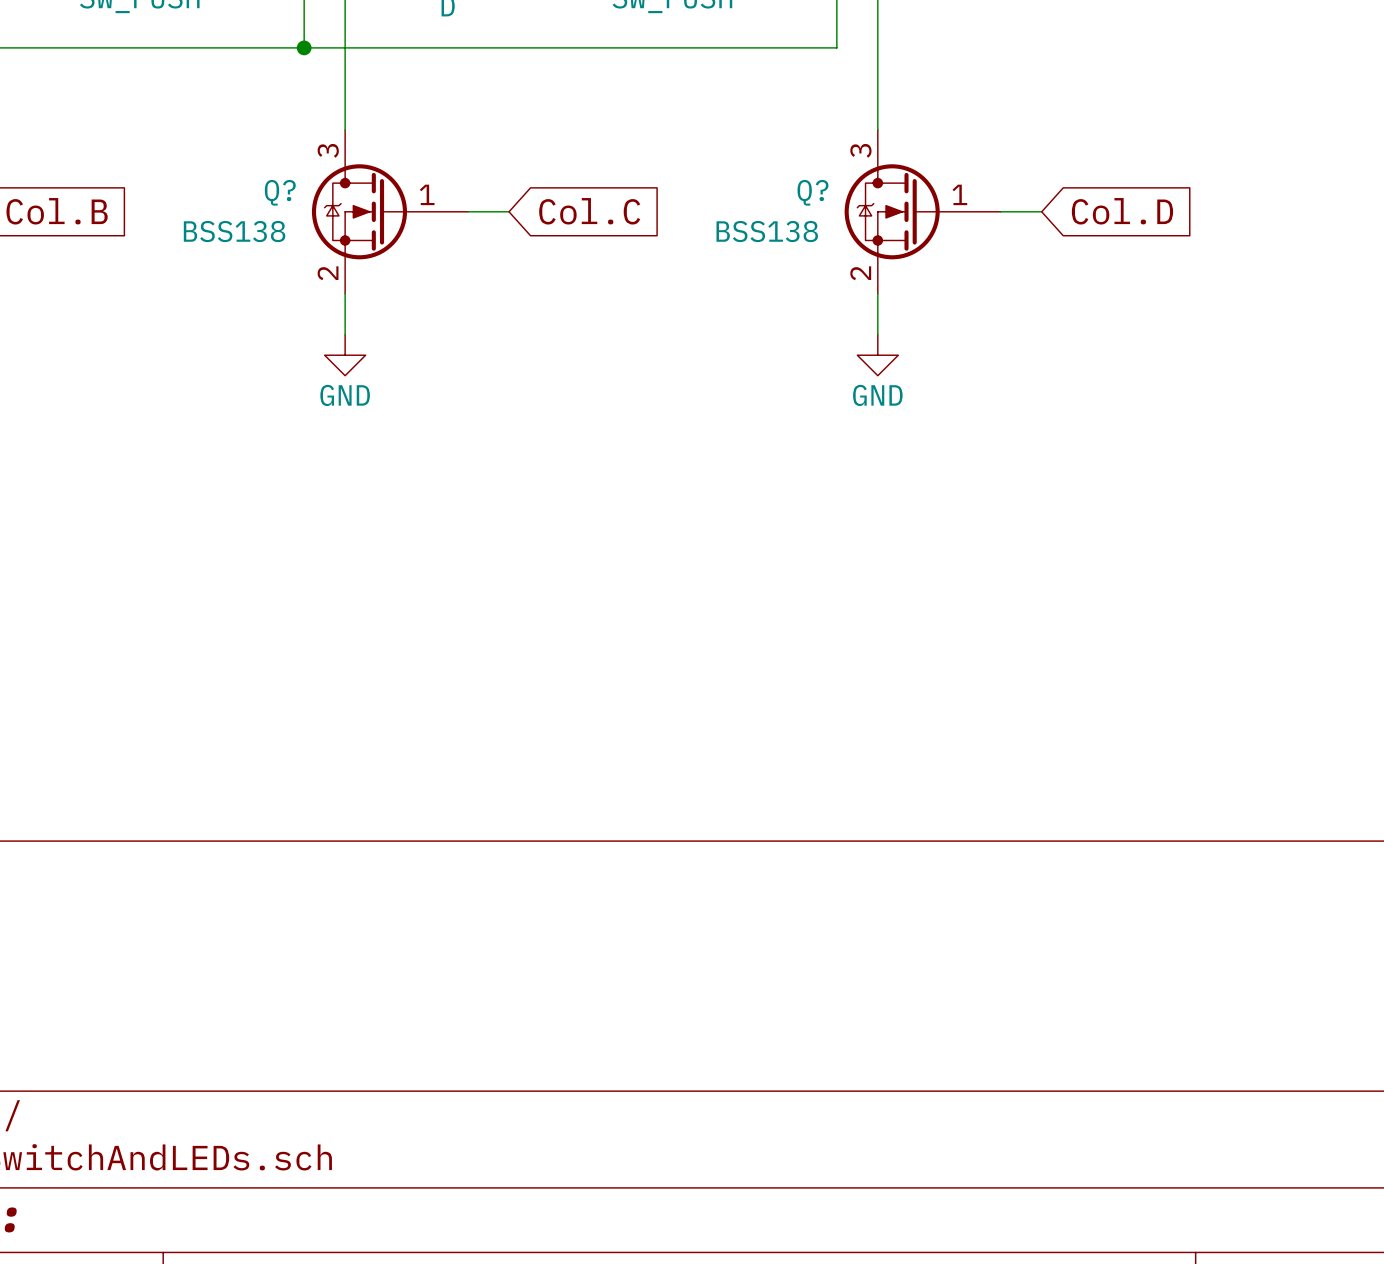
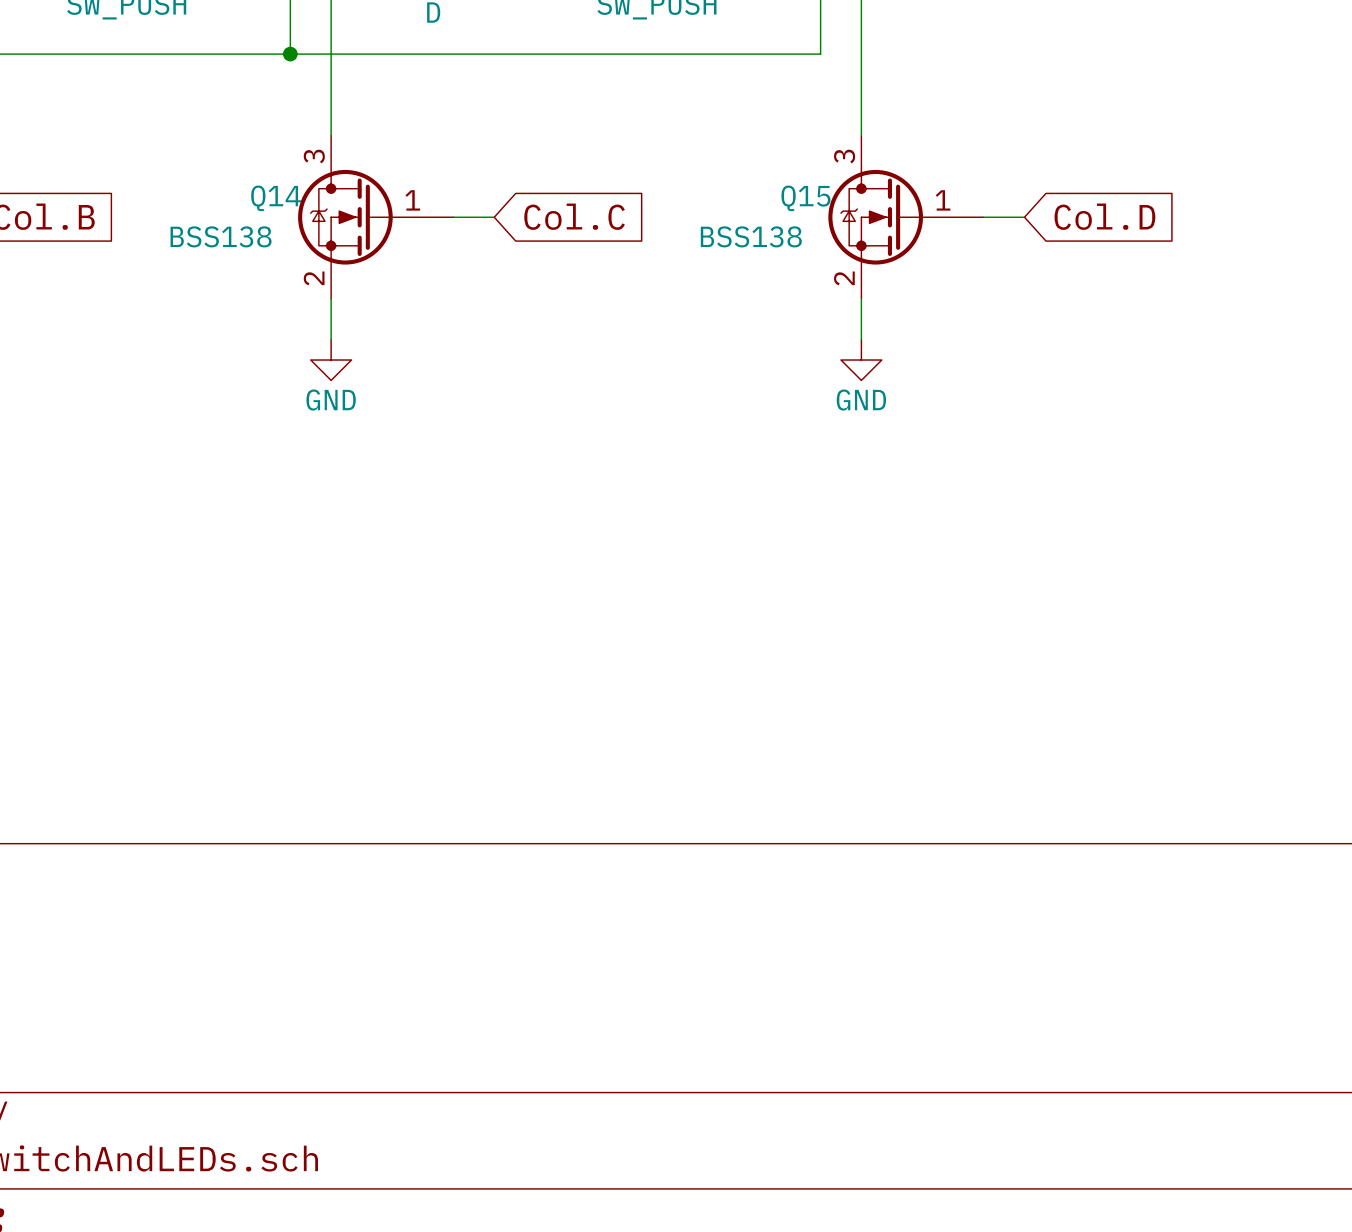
Q? name: Q? (280, 192) -> Q14 (276, 198)
Q? name: Q? (812, 192) -> Q15 (805, 198)

